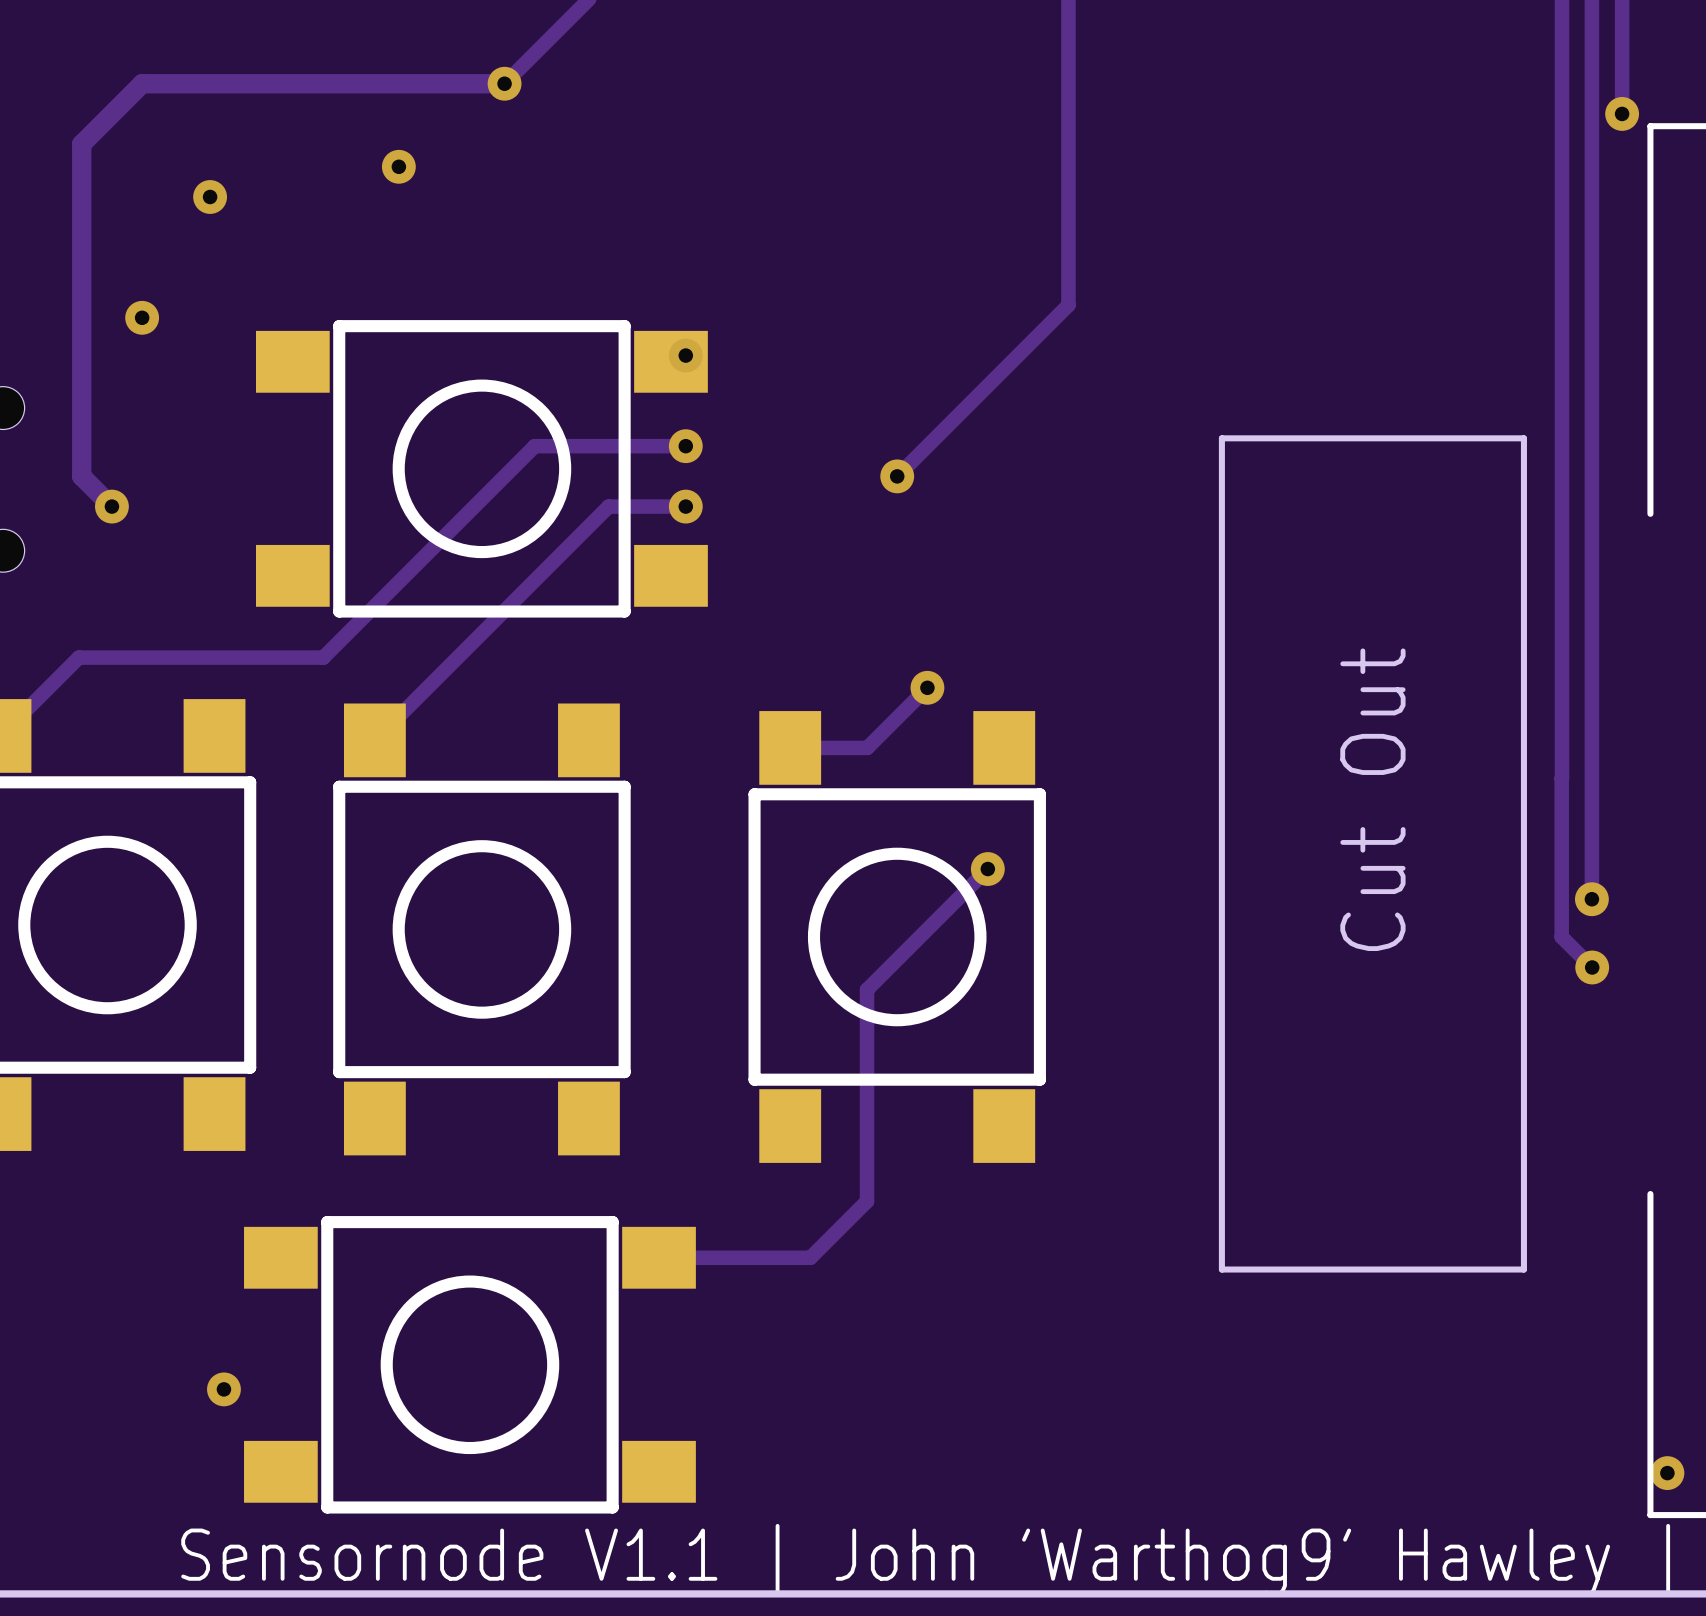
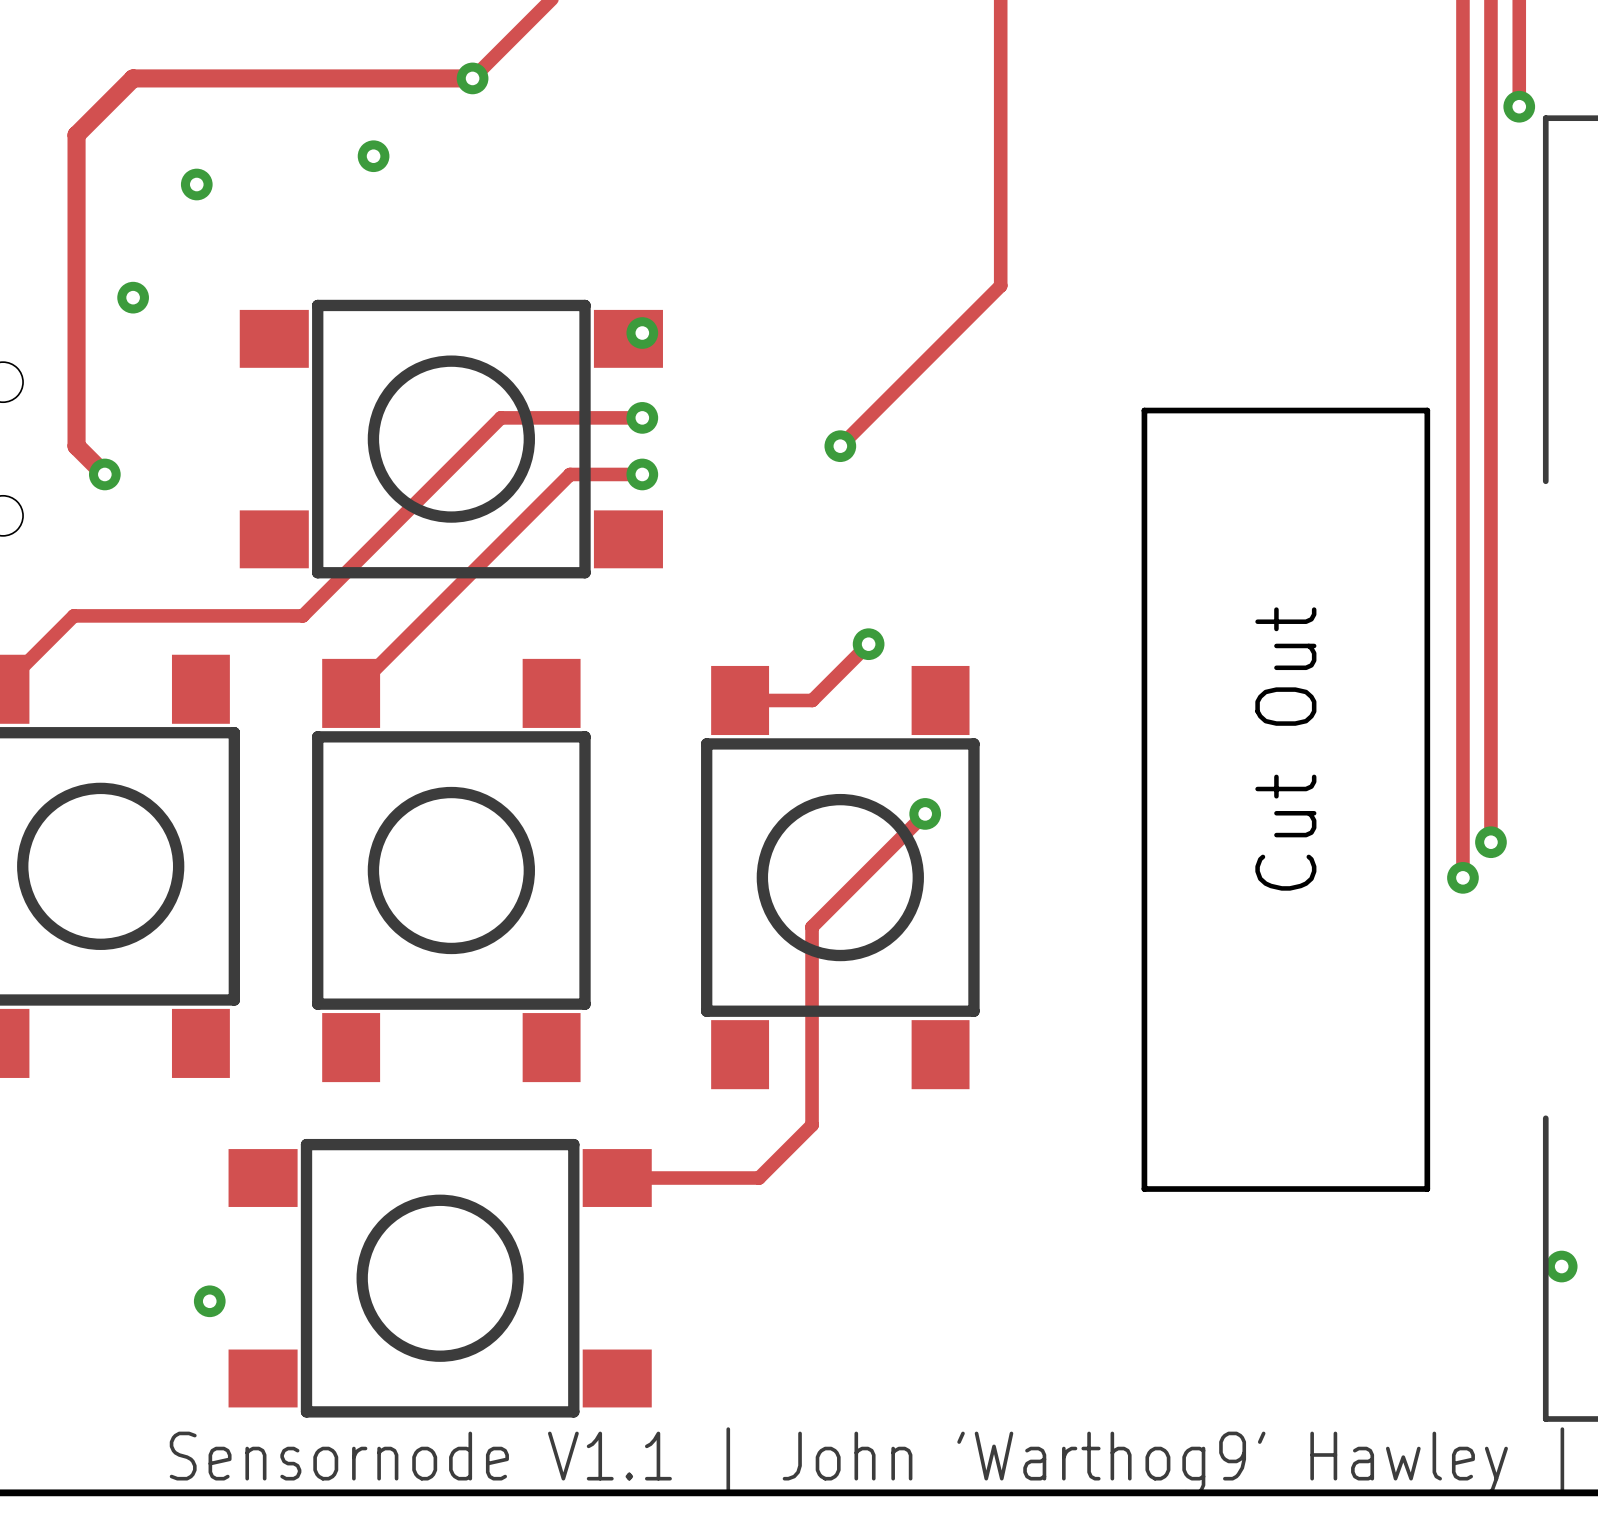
track: (1561, 778) (1561, 936) (1592, 967) -> (1462, 728) (1462, 877)
via position: (1592, 967) -> (1462, 877)
via position: (1667, 1473) -> (1561, 1266)

